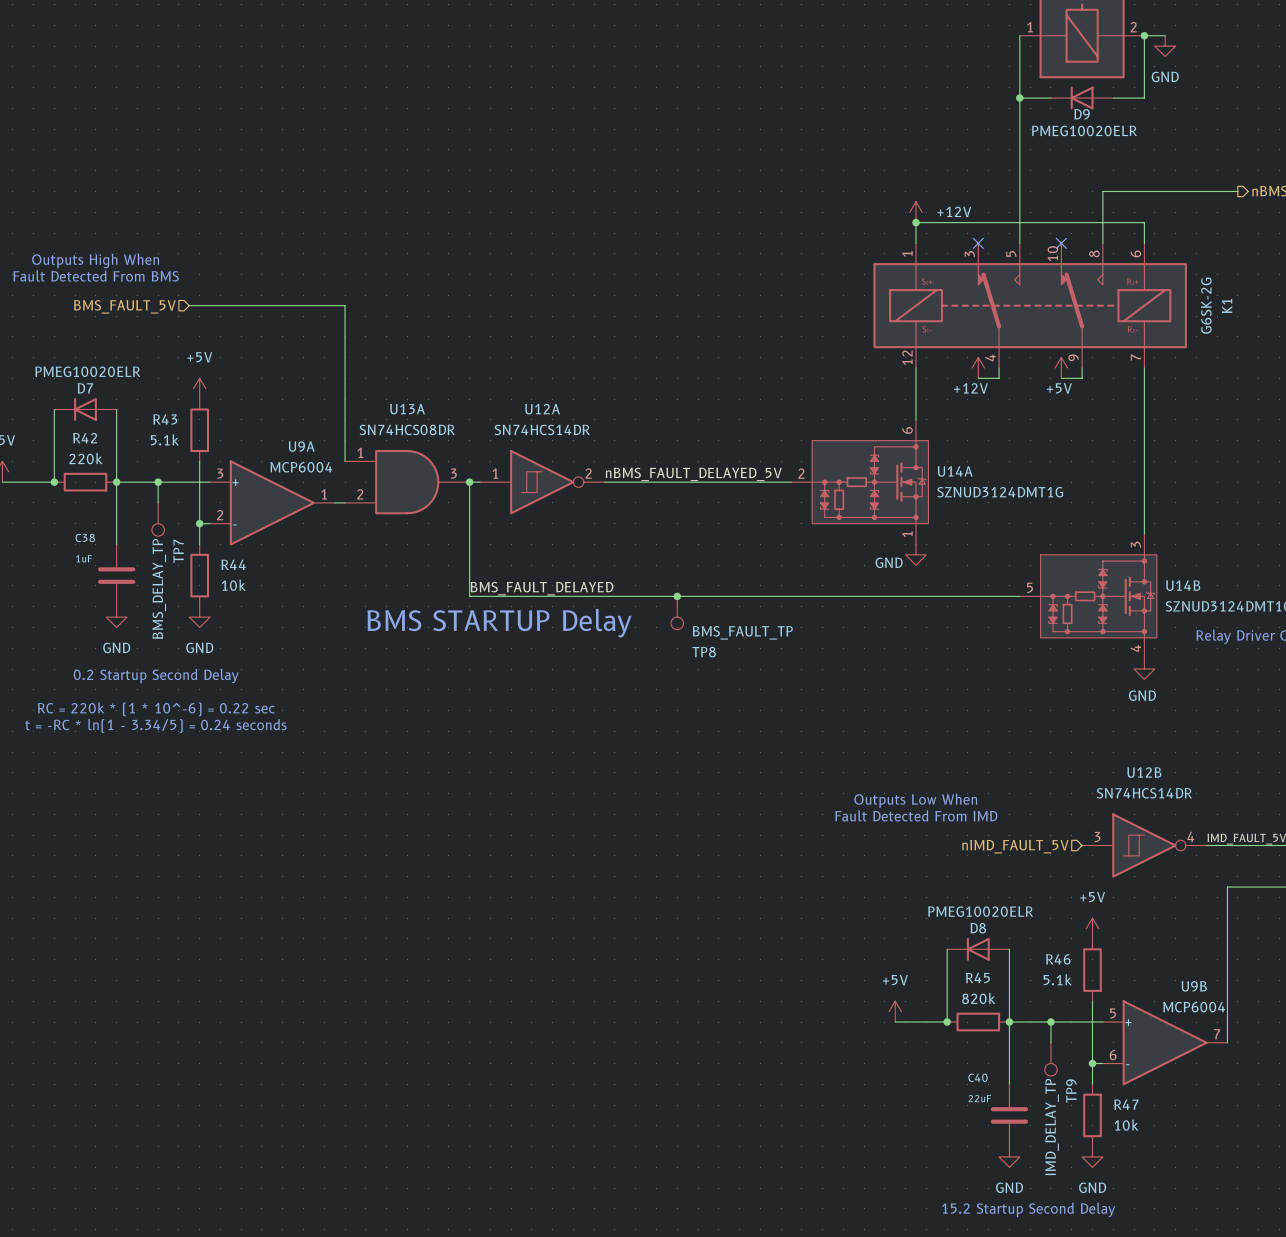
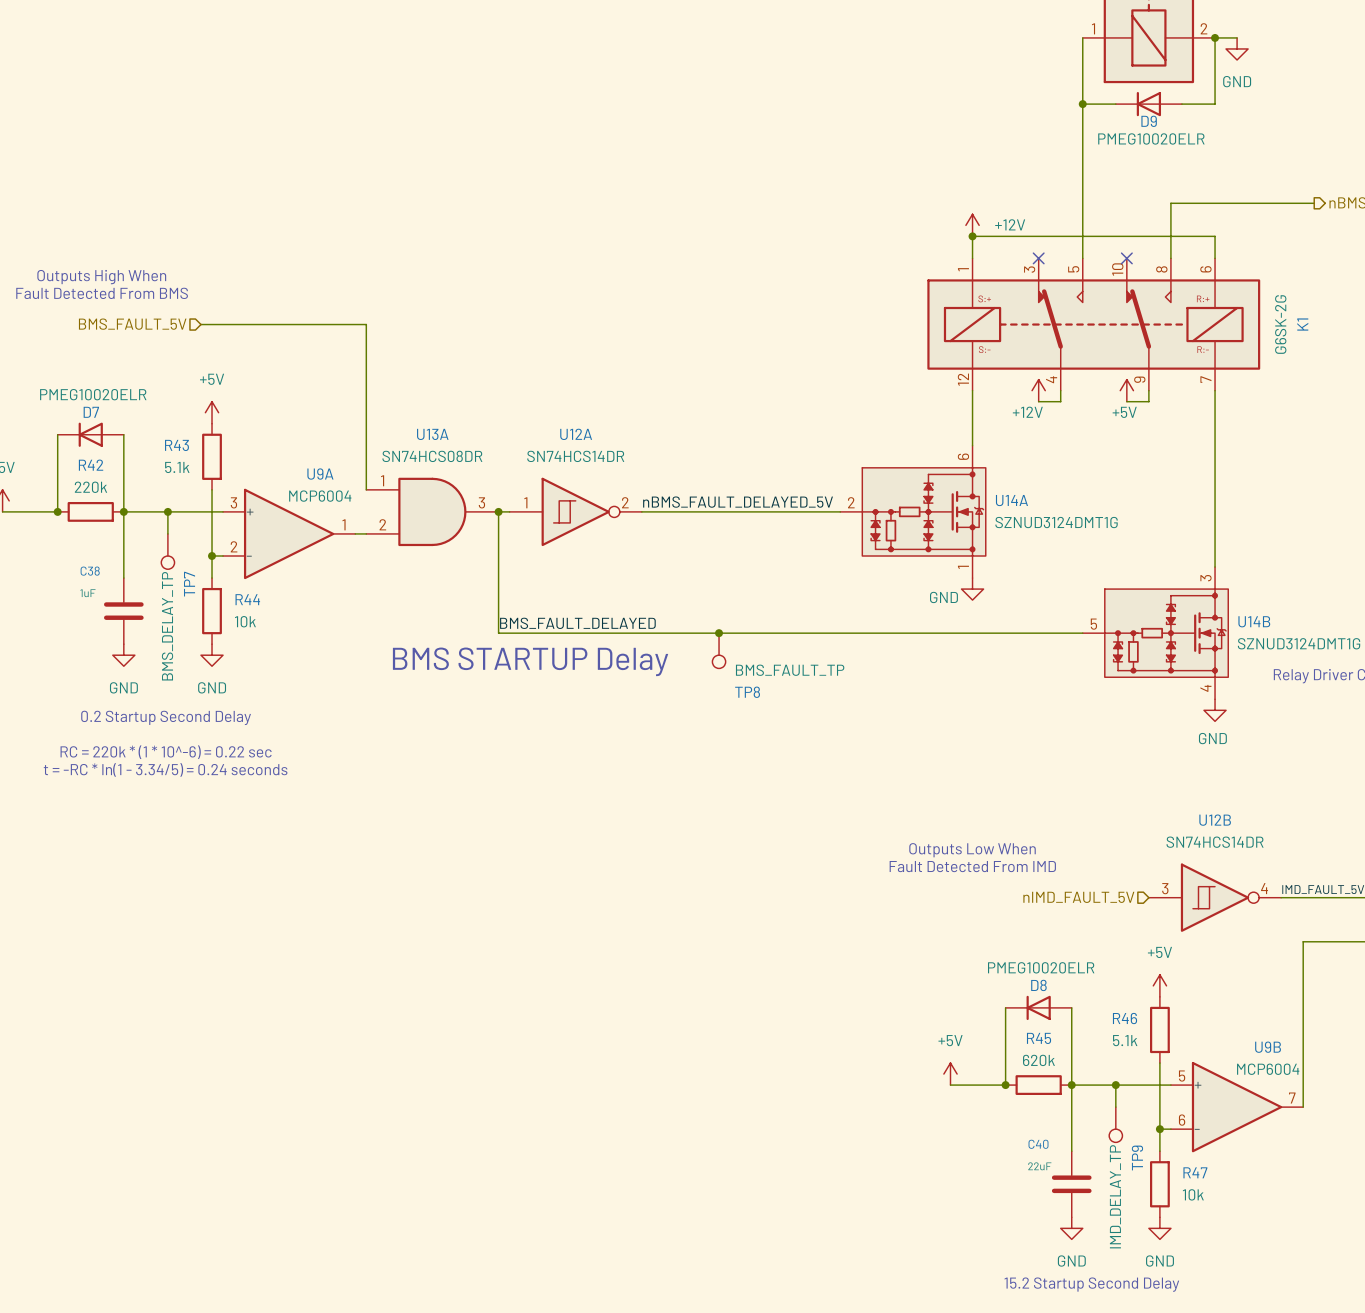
R45 value: 820k (978, 998) -> 620k (1038, 1060)

